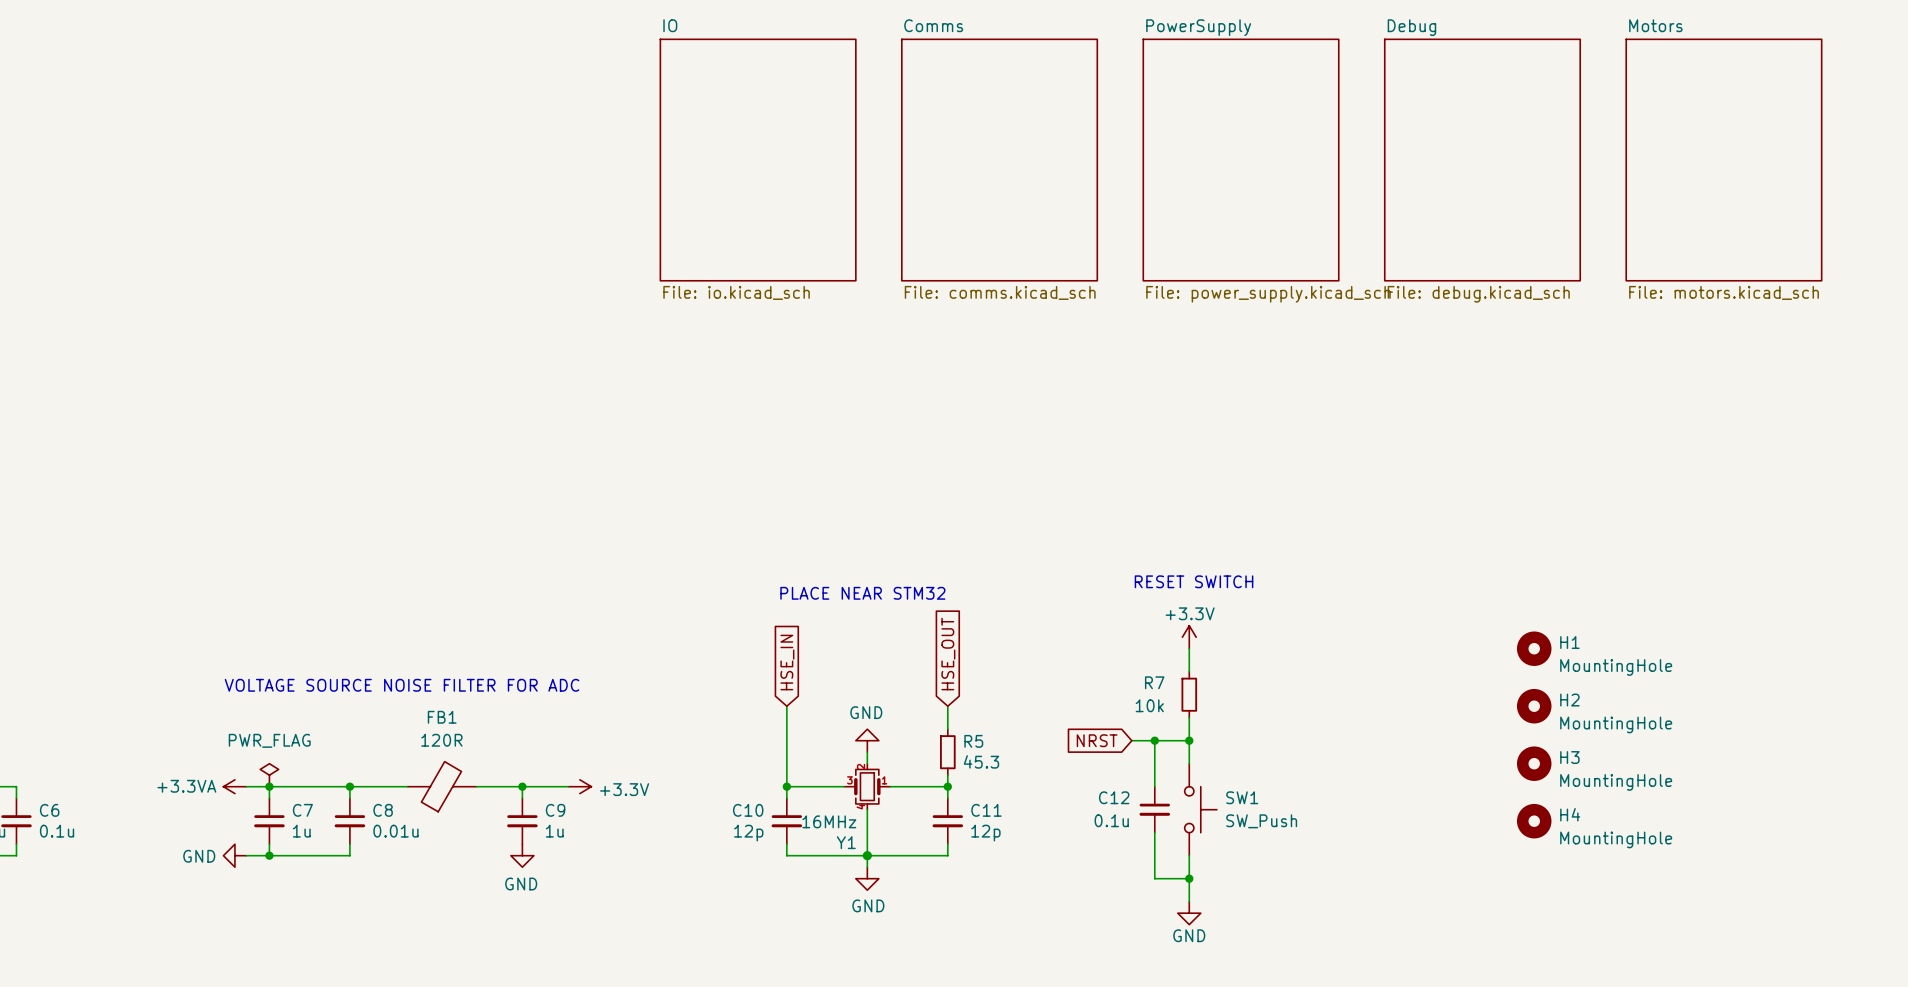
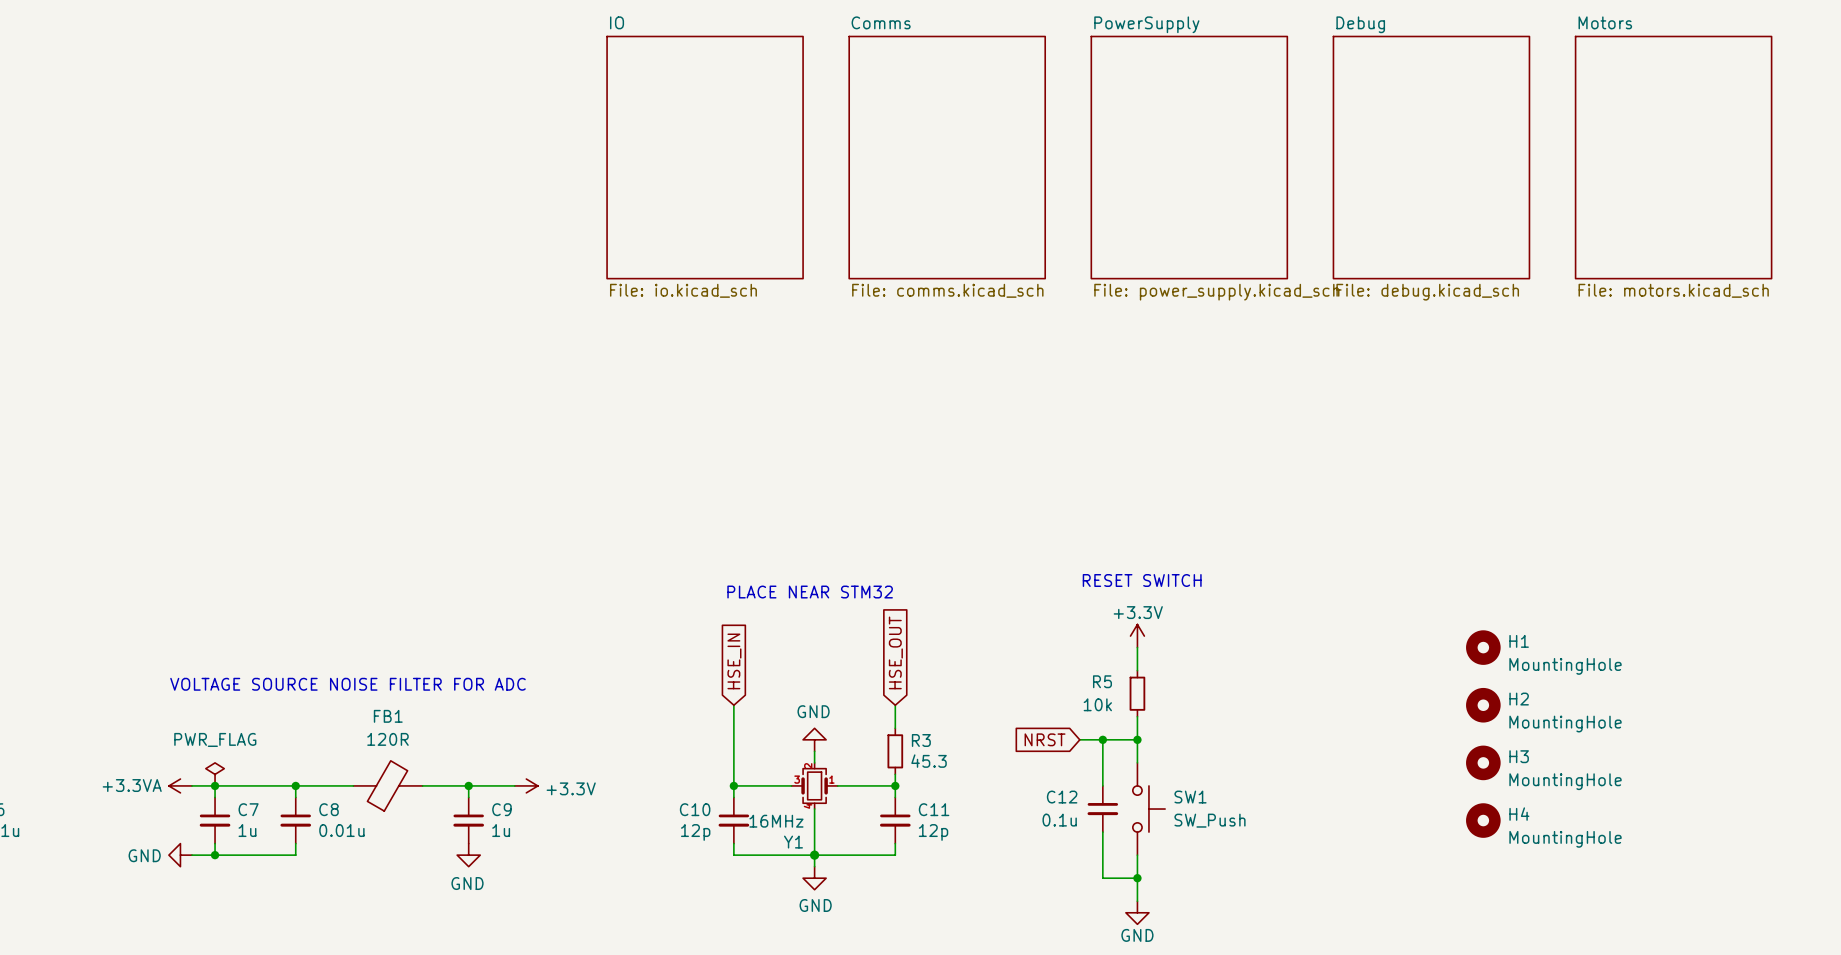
R7 name: R7 (1154, 682) -> R5 (1102, 681)
R5 name: R5 (973, 741) -> R3 (921, 740)

